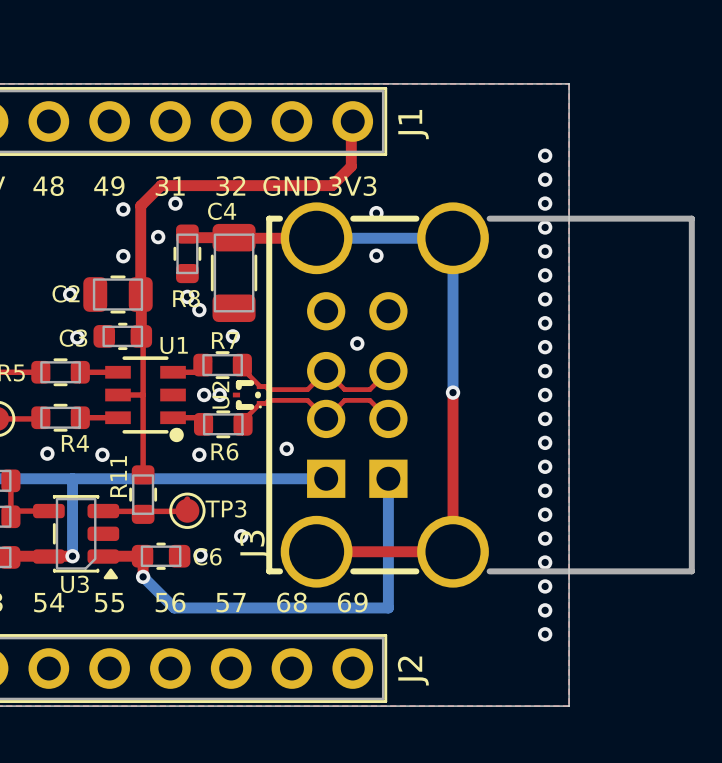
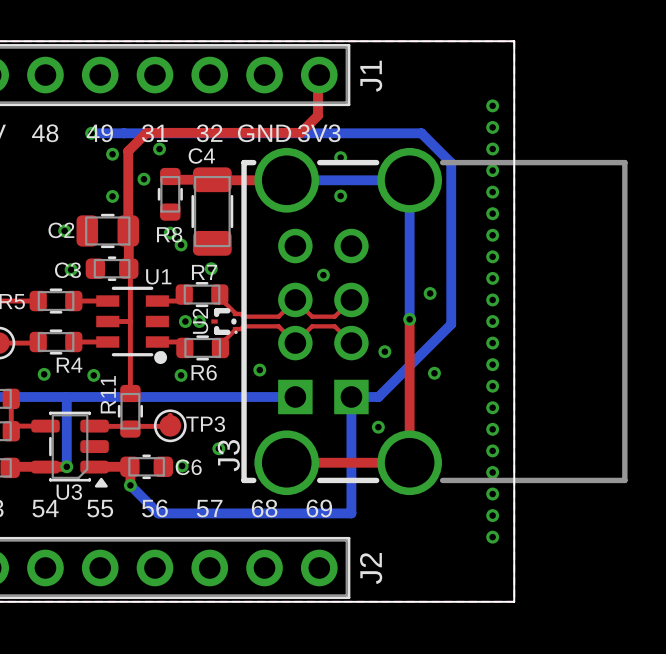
bottom track: none -> (91, 133) (421, 133) (451, 163) (451, 324) (378, 396) (351, 396)
via: none -> (91, 133)
via: none -> (430, 293)
via: none -> (384, 351)
via: none -> (434, 373)
via: none -> (378, 427)

